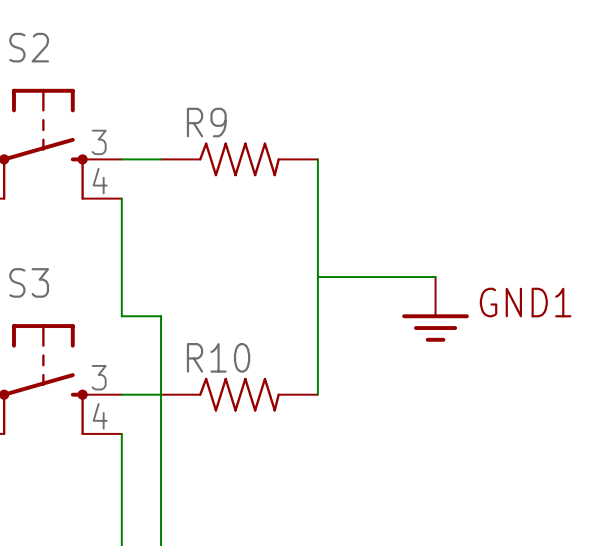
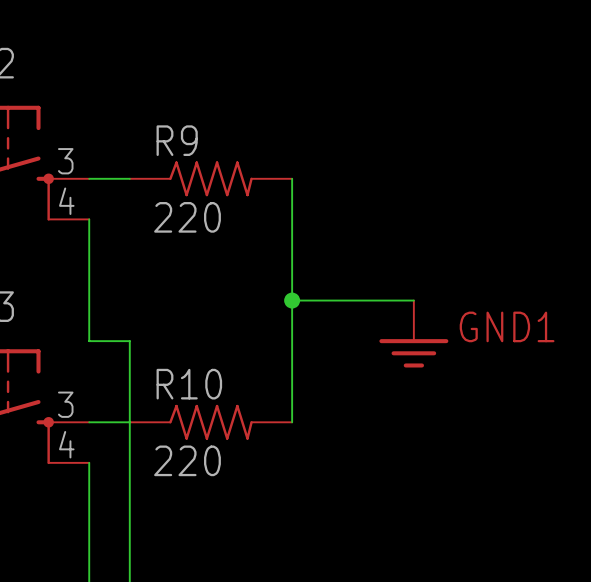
R9 value: none -> 220 (187, 217)
junction: none -> (292, 300)
R10 value: none -> 220 (187, 460)

